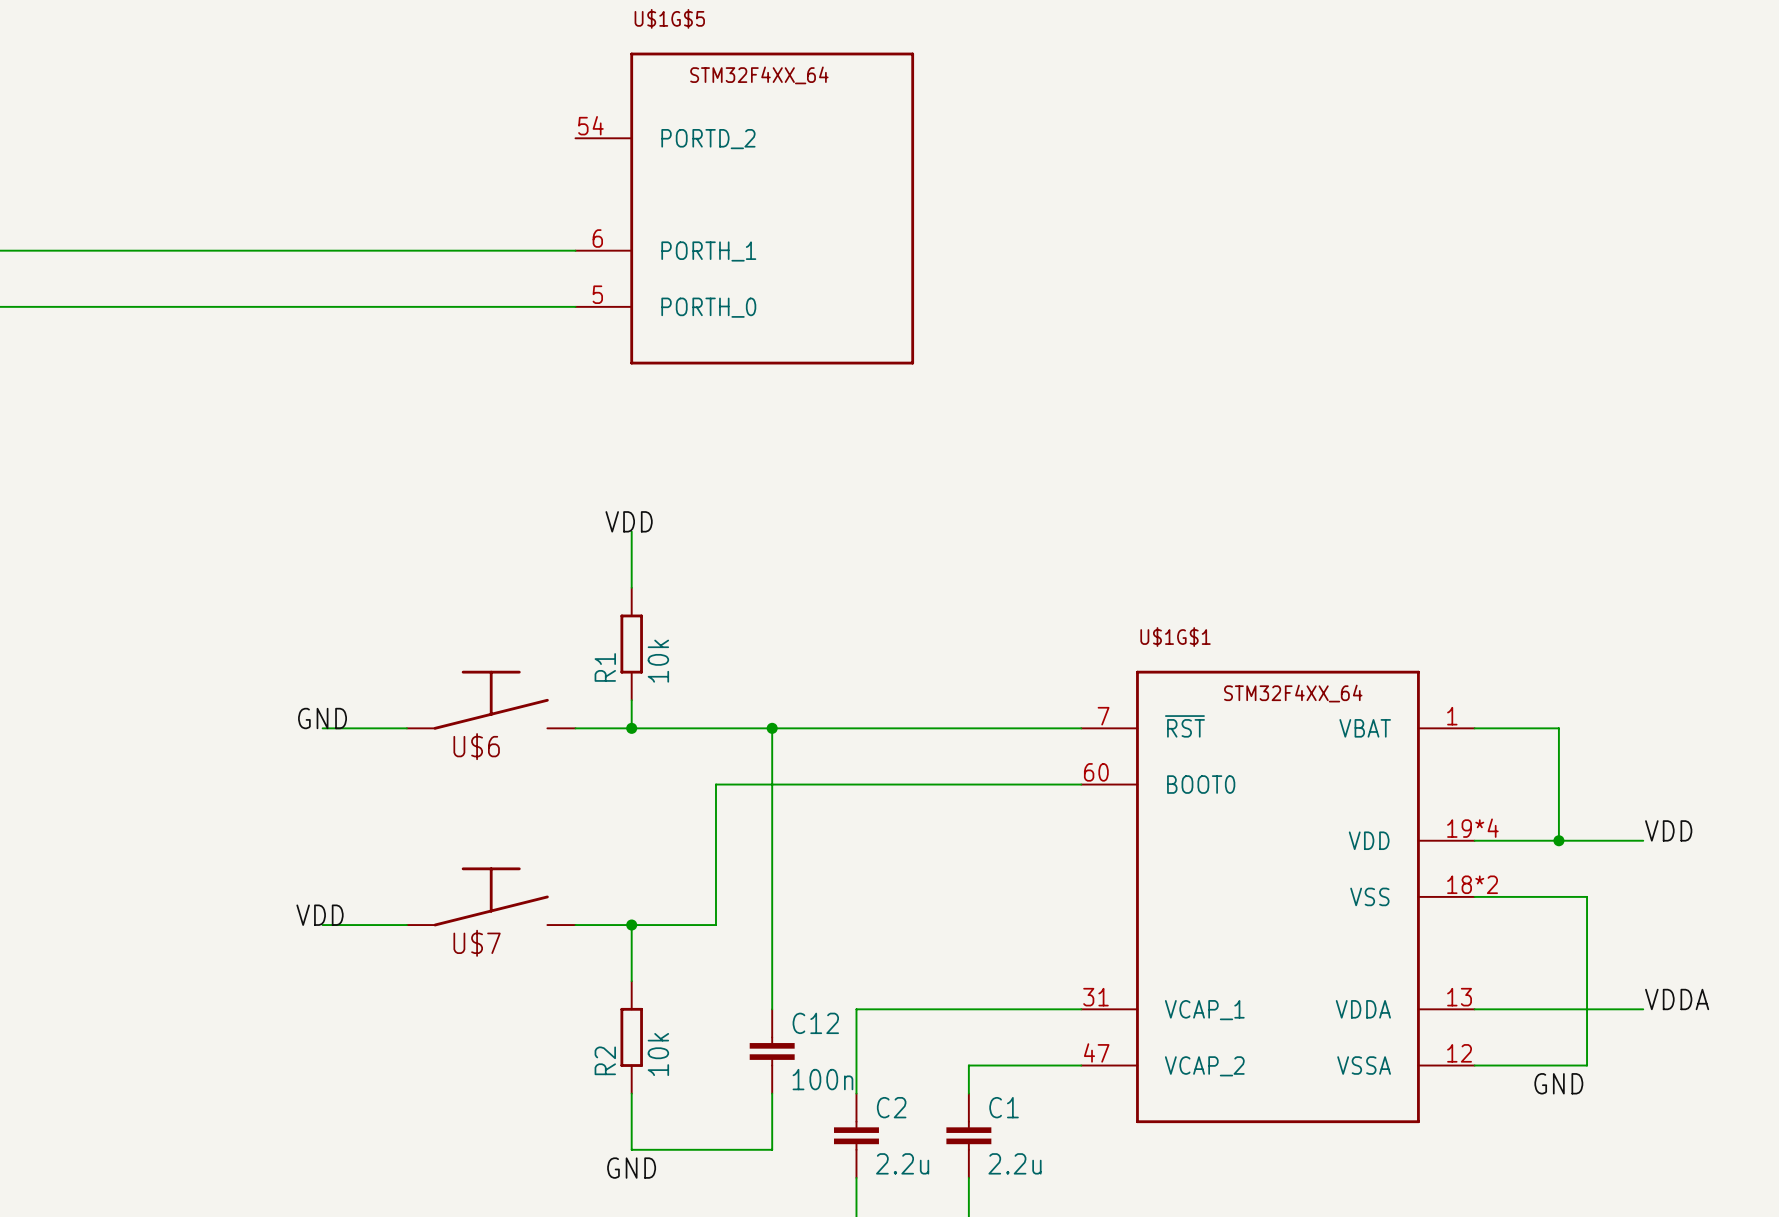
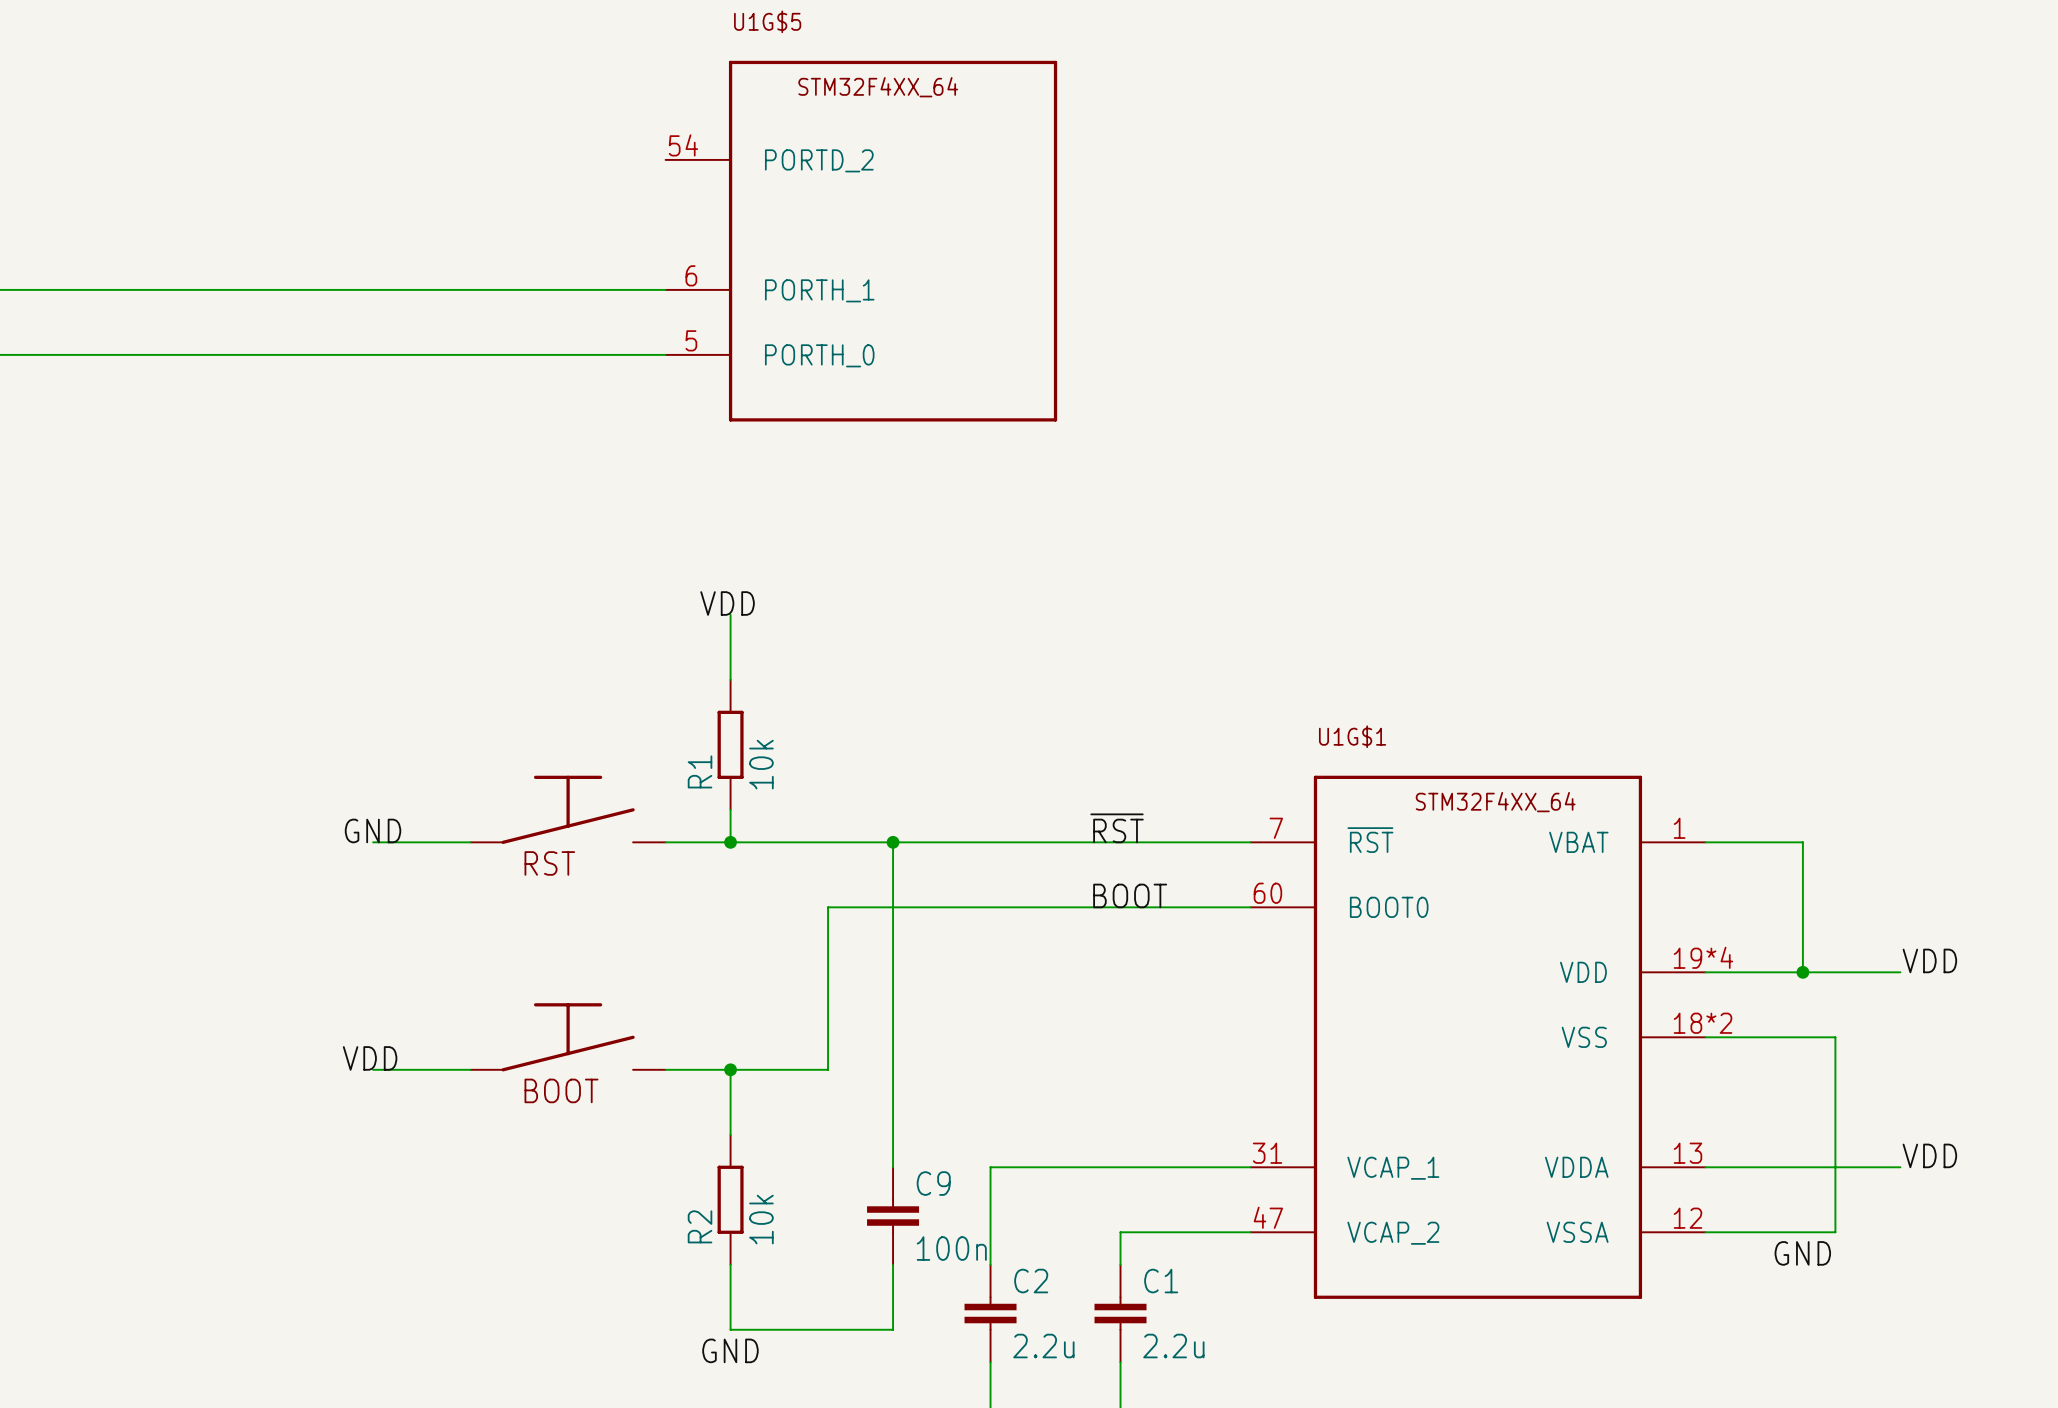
U$1G$5 name: U$1G$5 (669, 18) -> U1G$5 (767, 21)
U$1G$1 name: U$1G$1 (1175, 637) -> U1G$1 (1352, 736)
label: none -> ~{RST} (1117, 828)
U$6 name: U$6 (476, 746) -> RST (549, 863)
label: none -> BOOT (1130, 895)
U$7 name: U$7 (477, 943) -> BOOT (561, 1090)
label: VDDA (1677, 999) -> VDD (1929, 1155)
C12 name: C12 (815, 1023) -> C9 (933, 1183)

